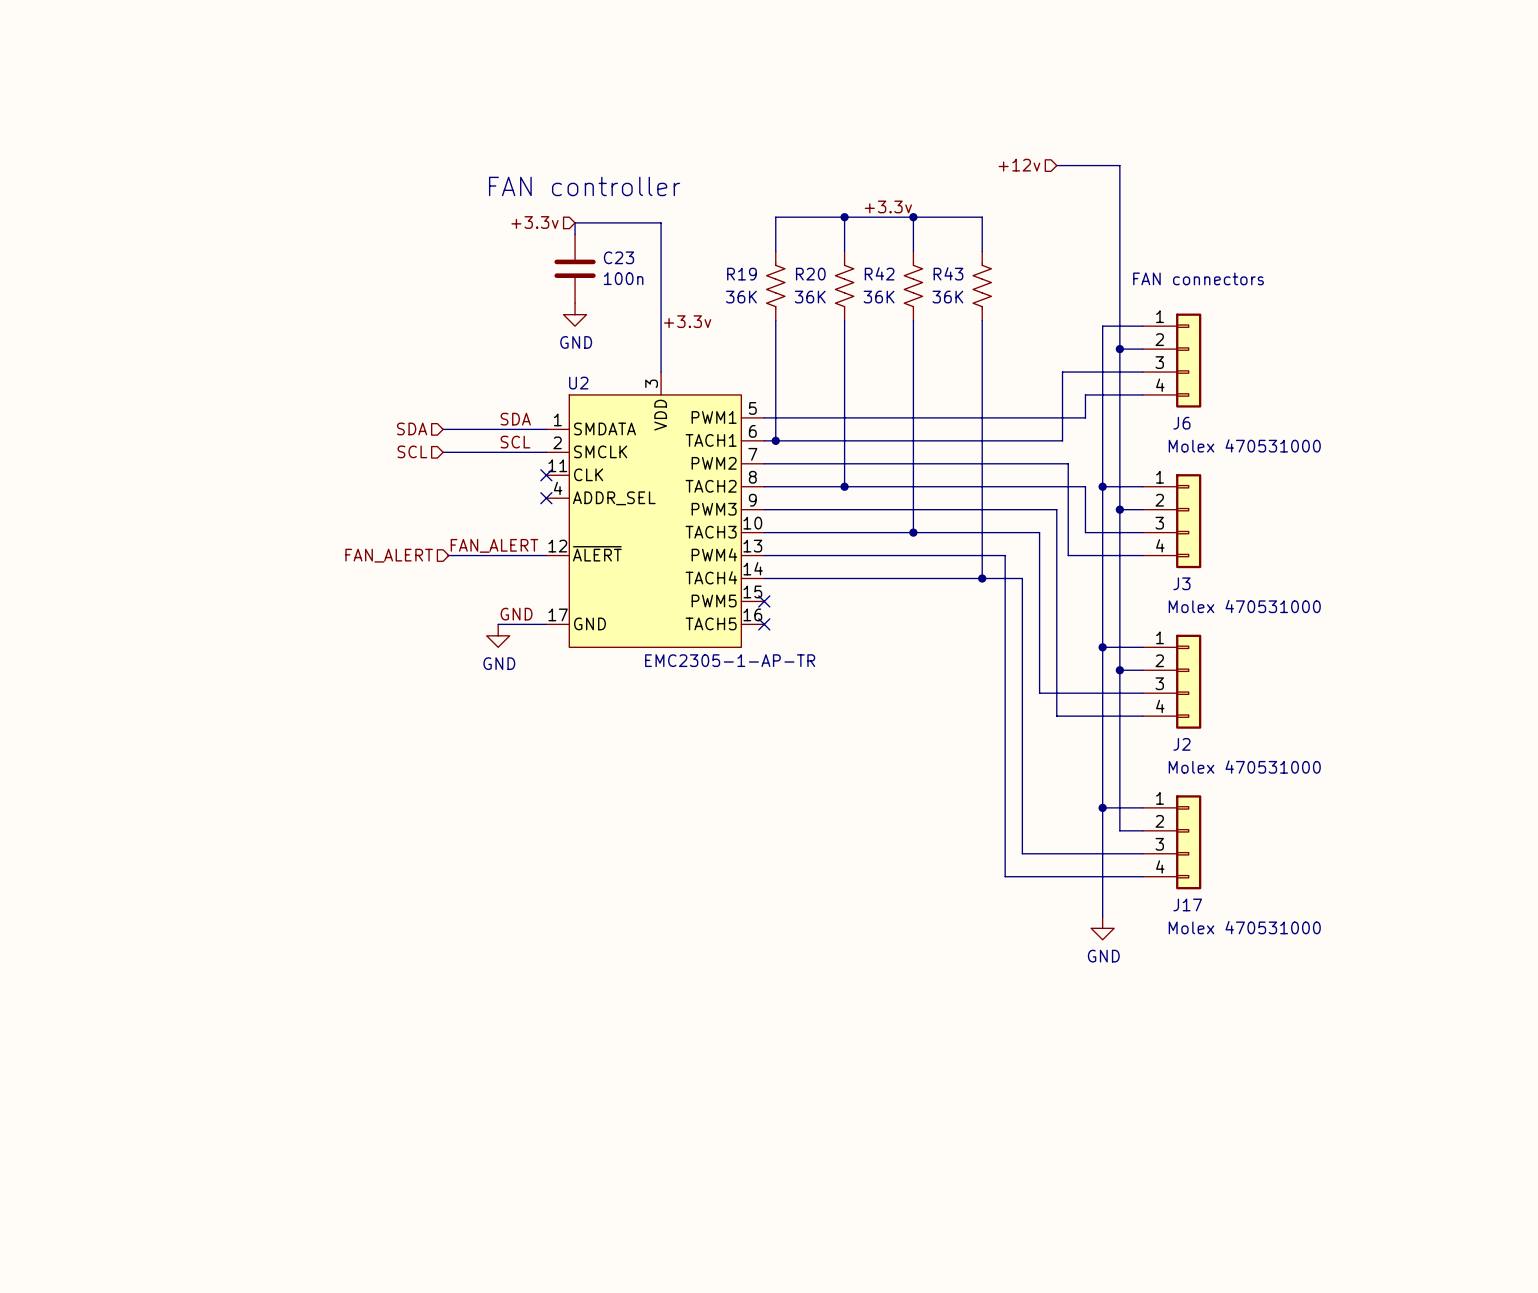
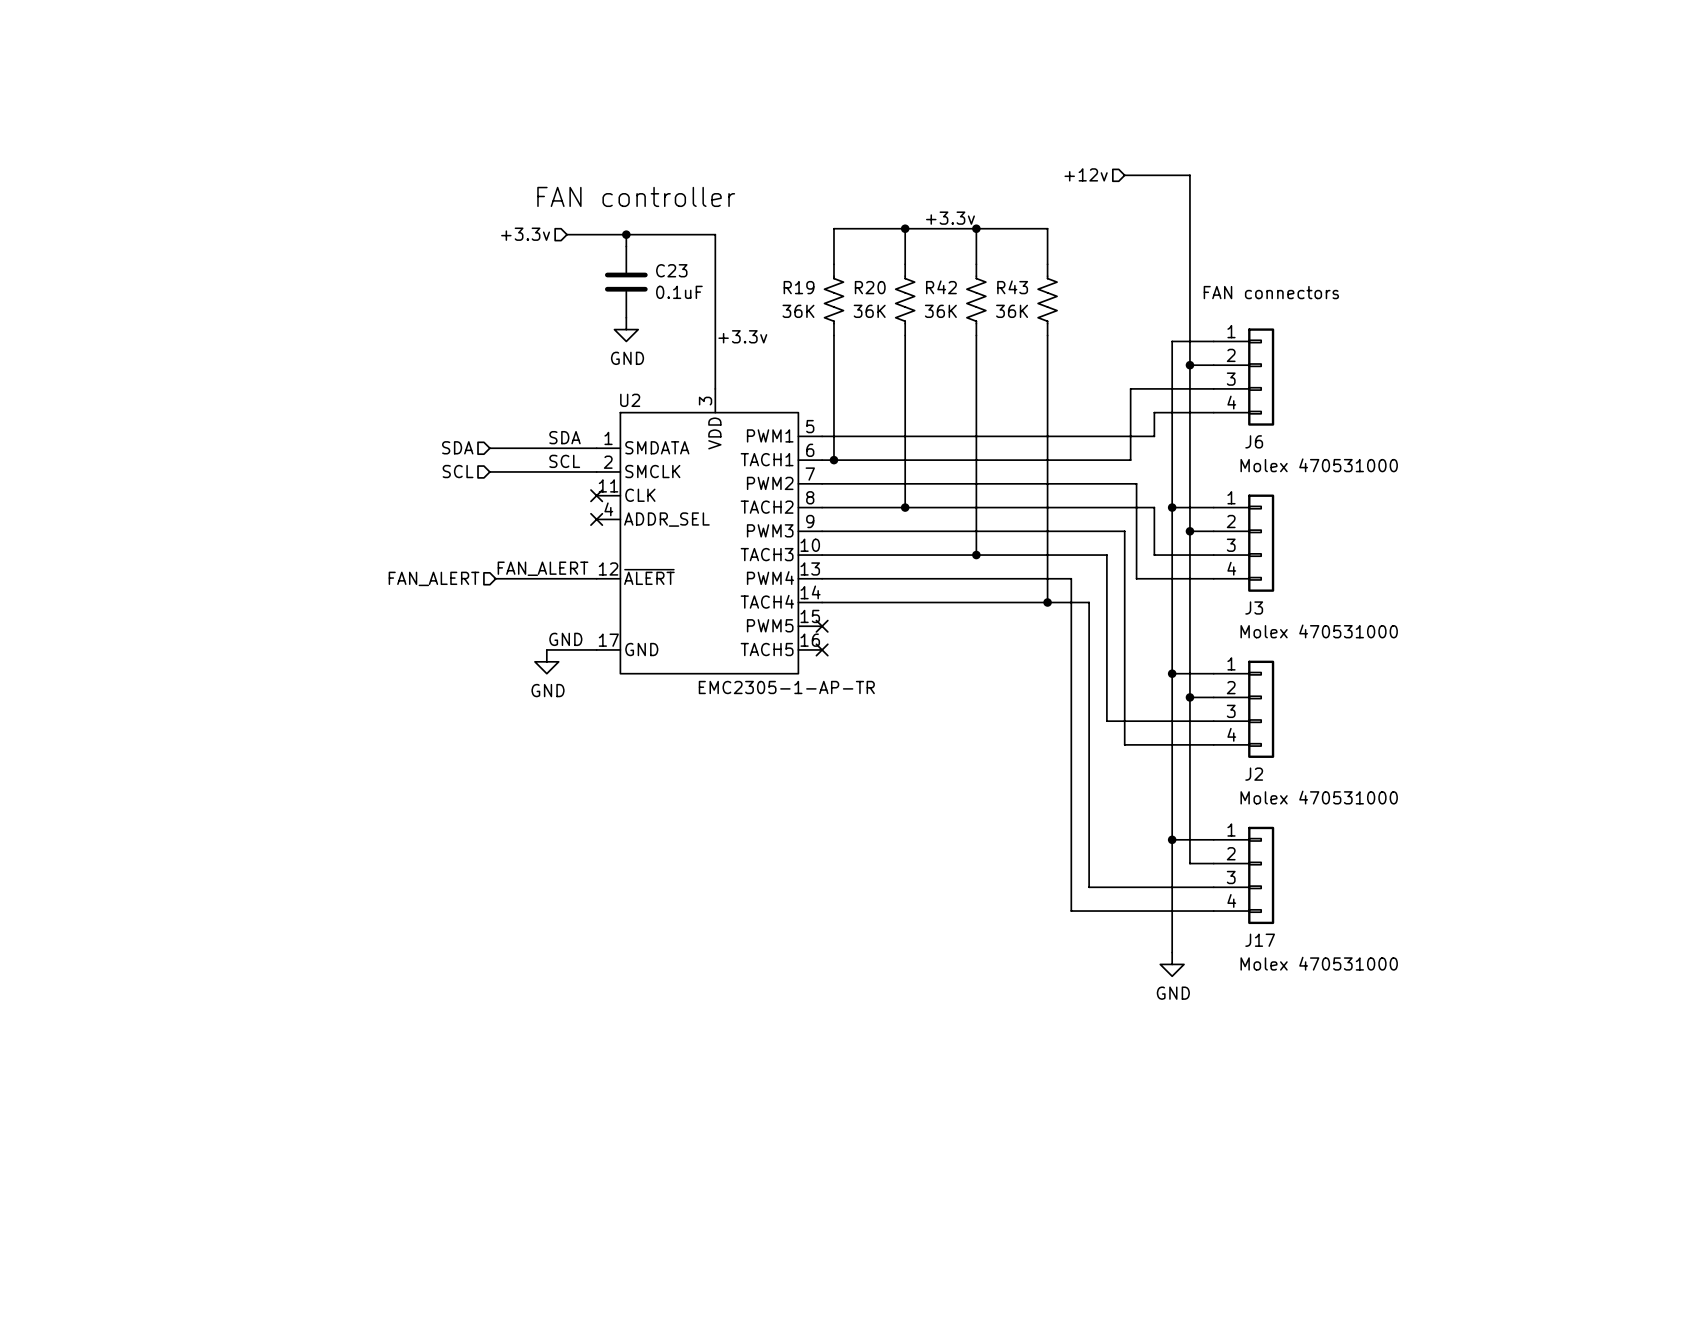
wire: none -> (567, 234) (626, 234)
hierarchical label position: +3.3v (534, 222) -> +3.3v (525, 234)
junction: none -> (626, 234)
C23 value: 100n (623, 278) -> 0.1uF (679, 292)

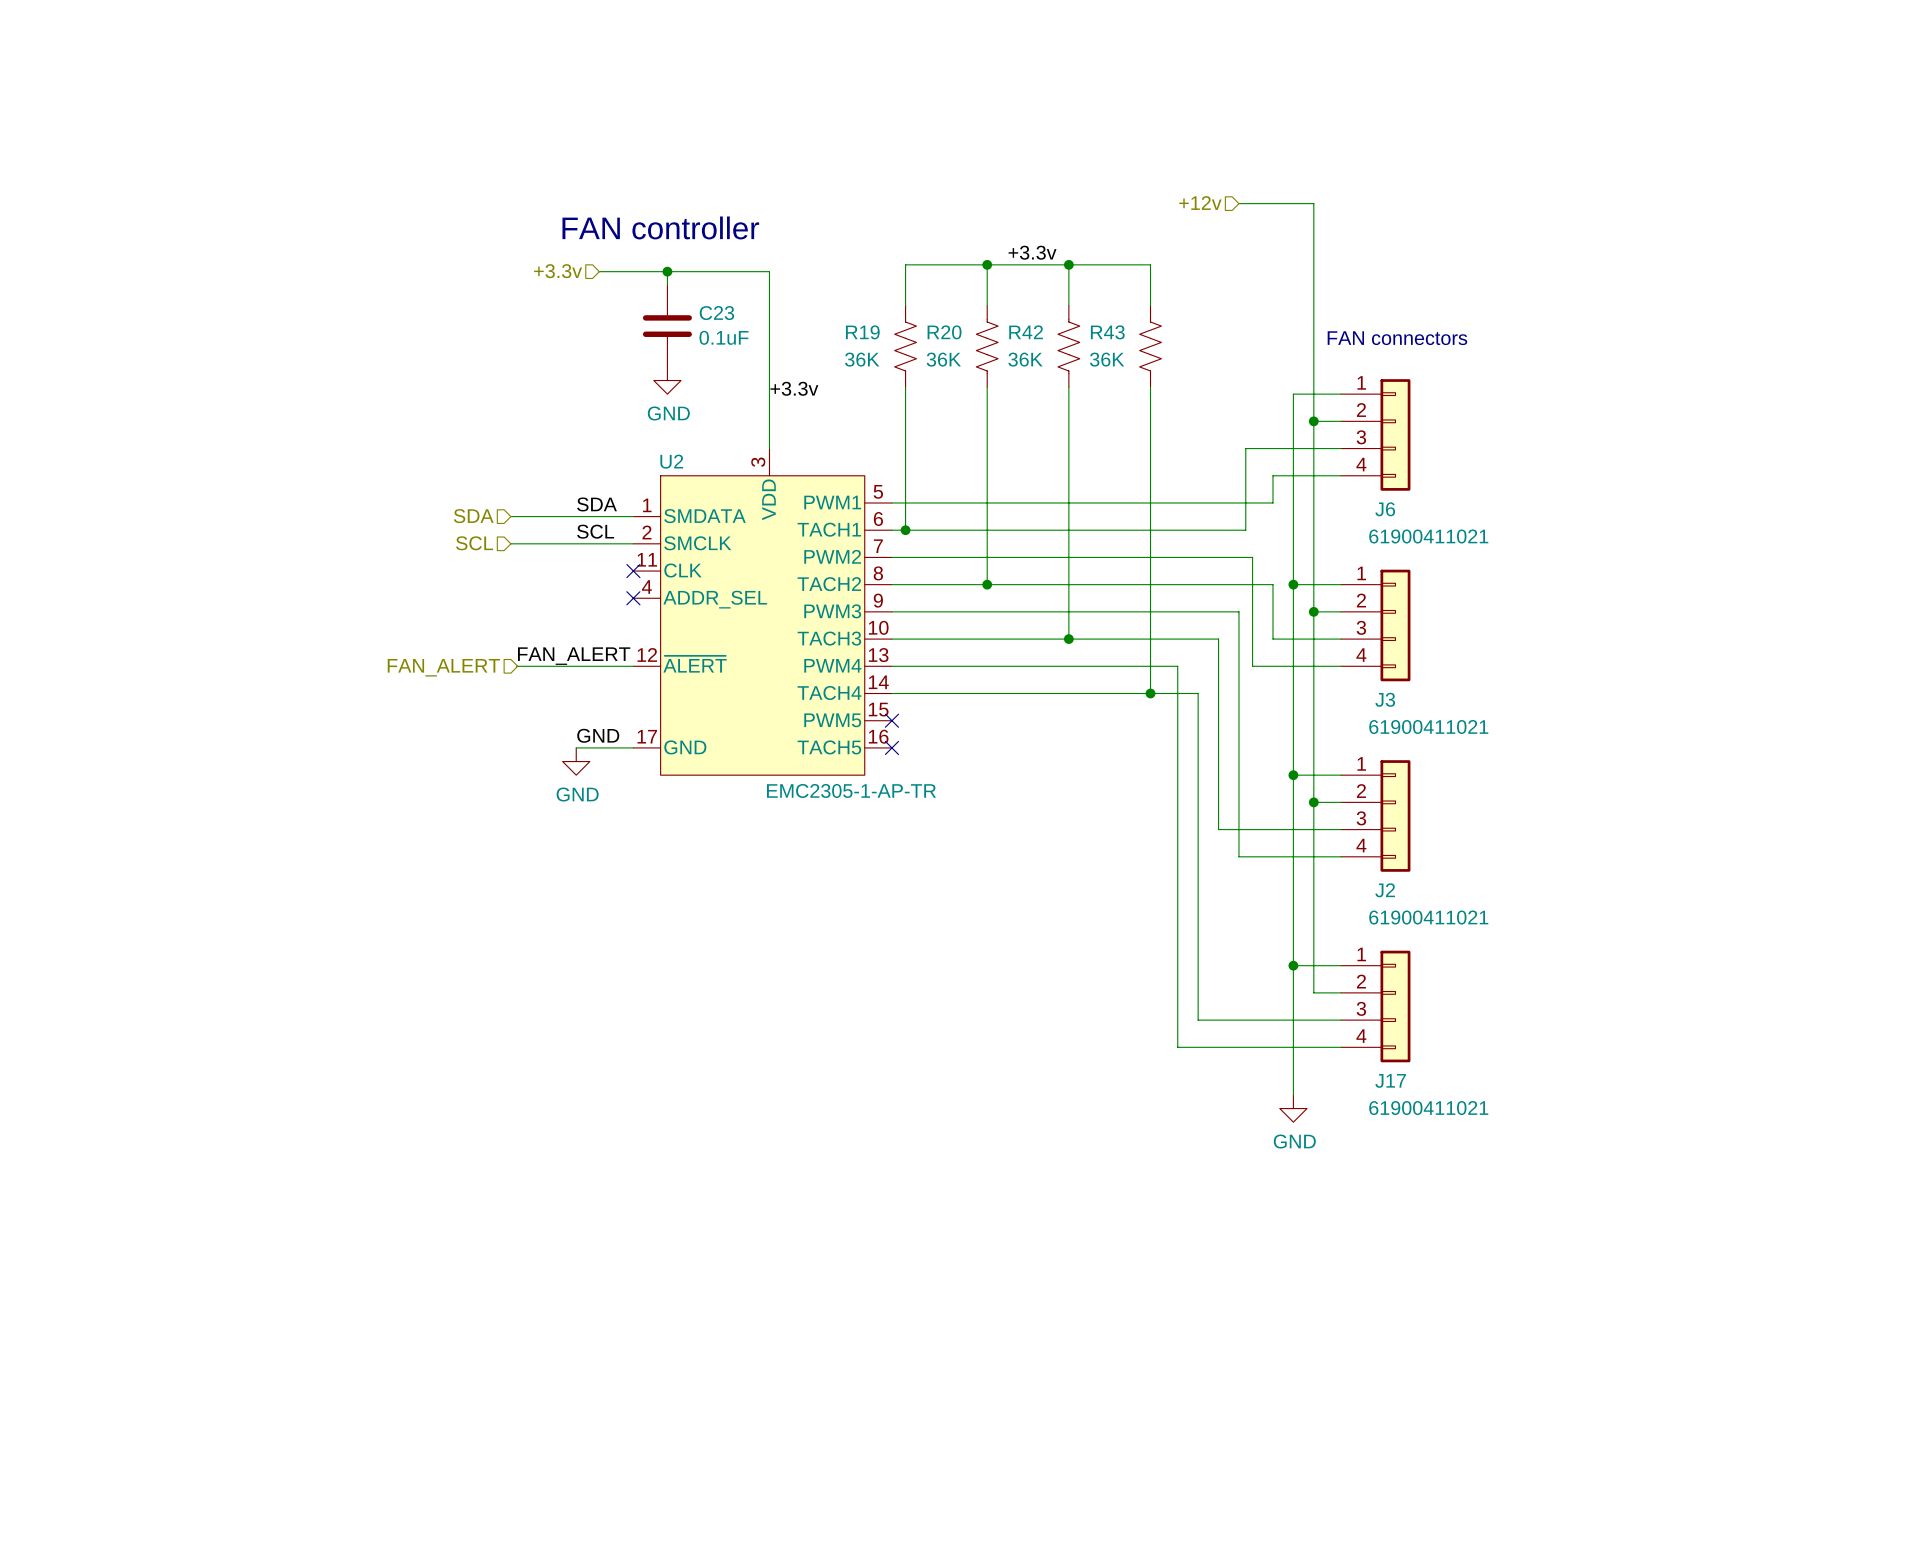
J6 value: Molex 470531000 (1319, 465) -> 61900411021 (1428, 536)
J3 value: Molex 470531000 (1319, 631) -> 61900411021 (1428, 727)
J2 value: Molex 470531000 (1319, 797) -> 61900411021 (1428, 917)
J17 value: Molex 470531000 (1319, 963) -> 61900411021 (1428, 1108)

